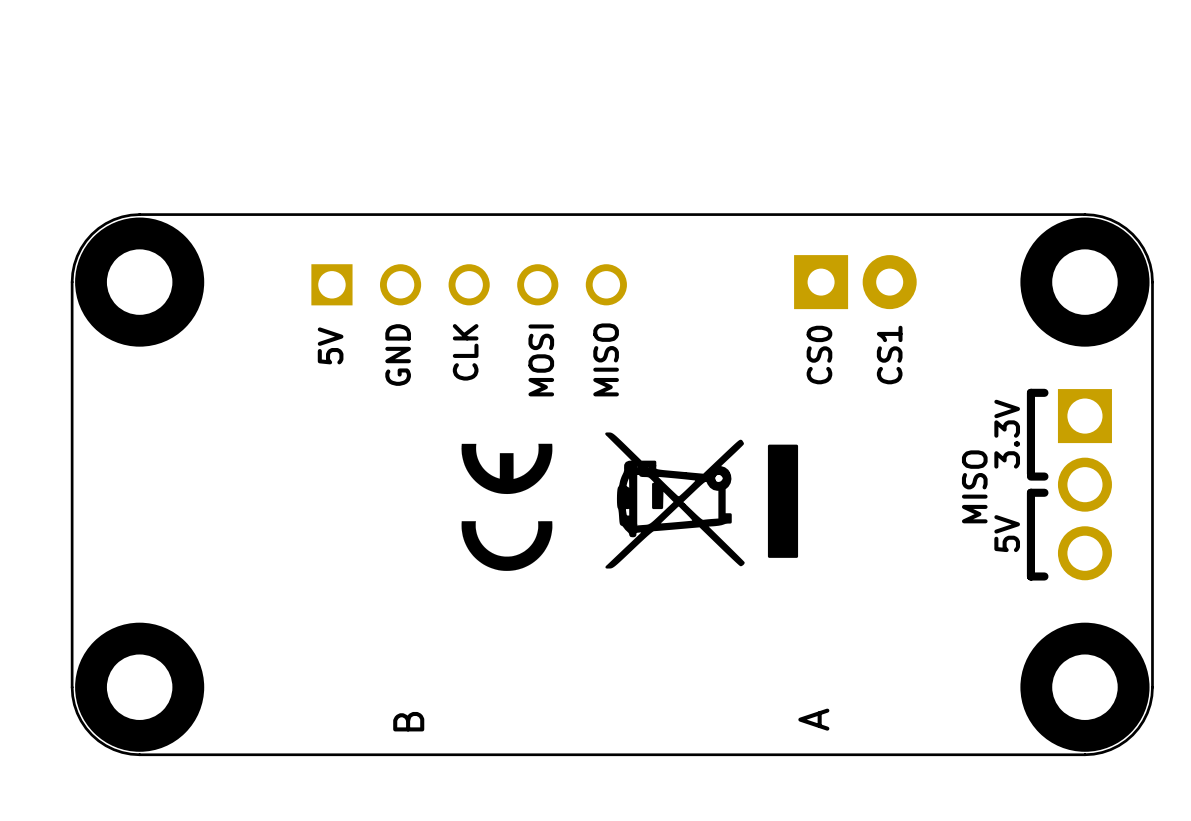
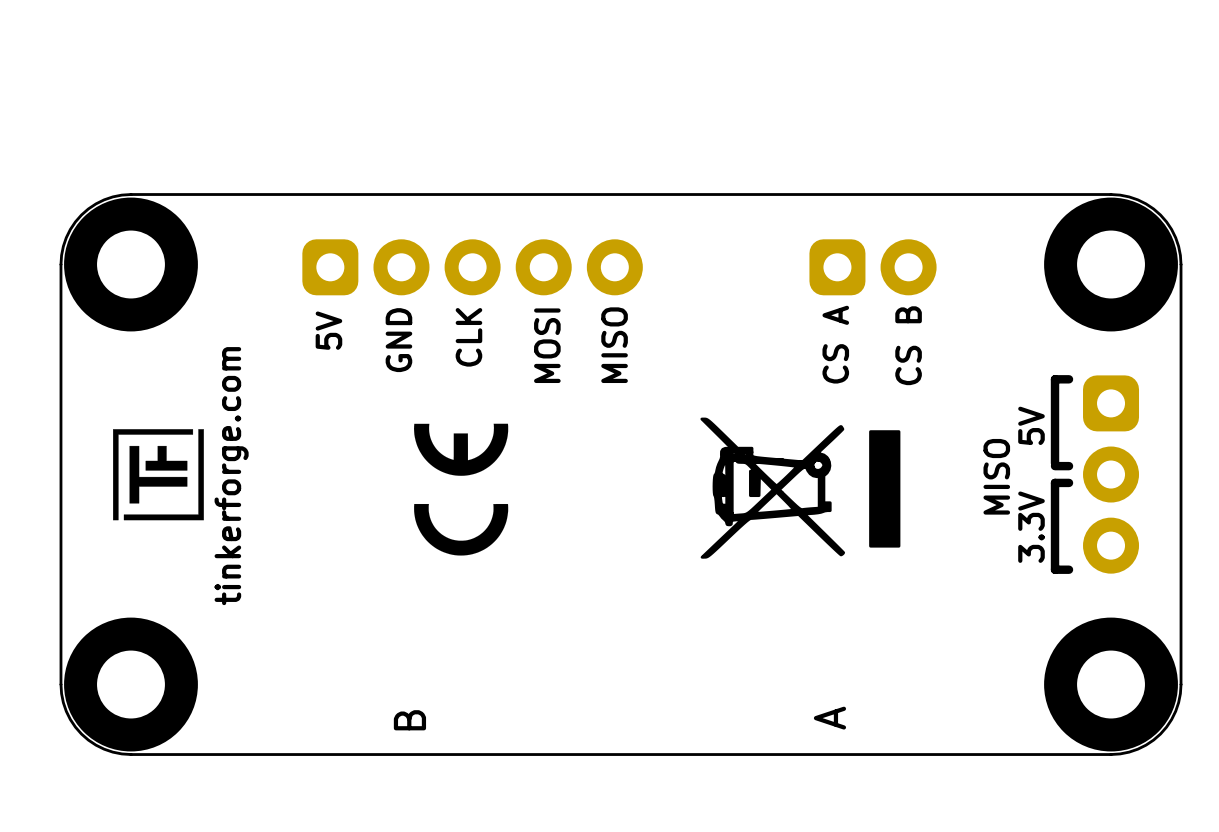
part footprint: [794, 255, 917, 310] -> [809, 239, 937, 296]
part footprint: [311, 264, 627, 306] -> [302, 239, 643, 296]
text: CS0 (819, 355) -> CS A (835, 344)
text: CS1 (889, 355) -> CS B (908, 345)
part footprint: [1057, 389, 1112, 581] -> [1083, 375, 1140, 574]
text: 3.3V (1007, 434) -> 5V (1031, 425)
drawing: none -> [113, 429, 204, 521]
text: none -> tinkerforge.com (231, 476)
drawing position: (701, 500) -> (800, 488)
drawing position: (506, 507) -> (461, 489)
text: 5V (1007, 533) -> 3.3V (1031, 527)

